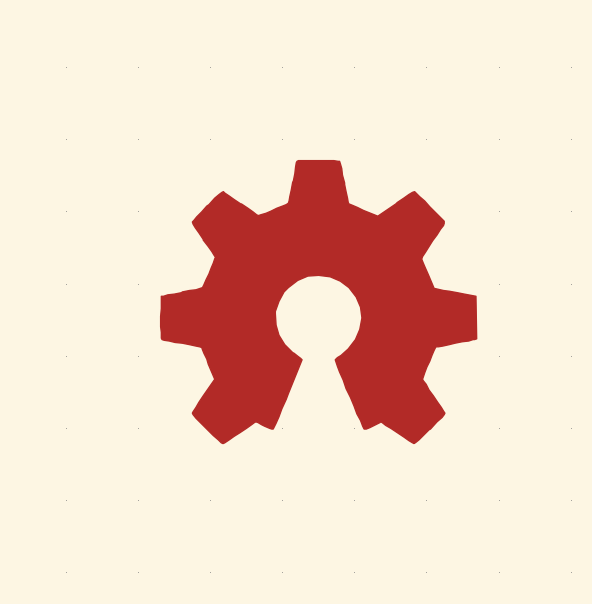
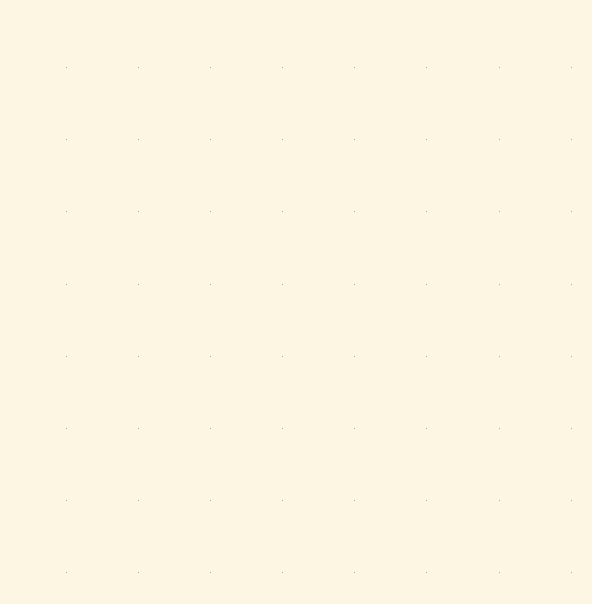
part: (318, 302) -> none

